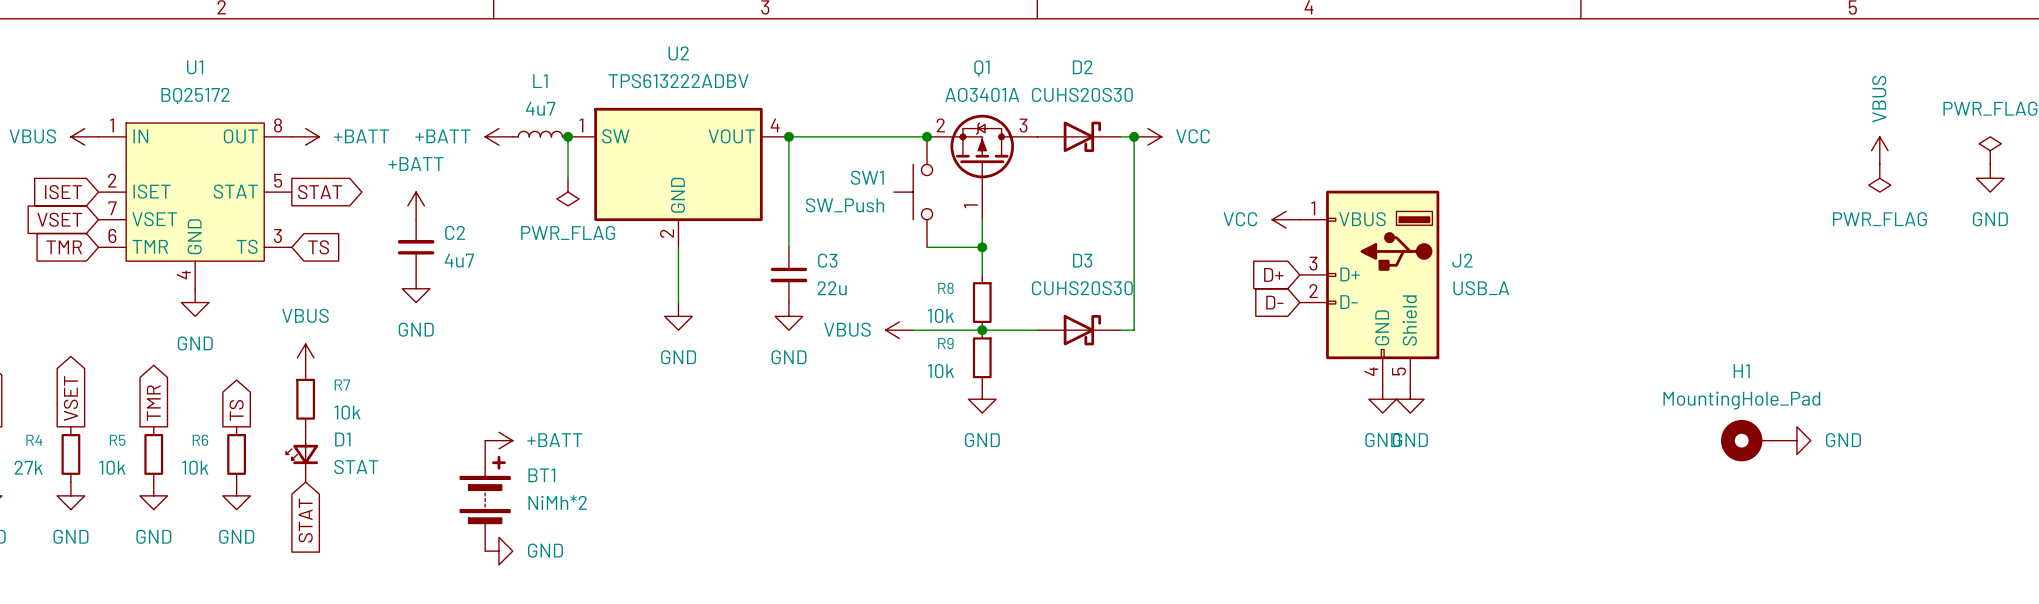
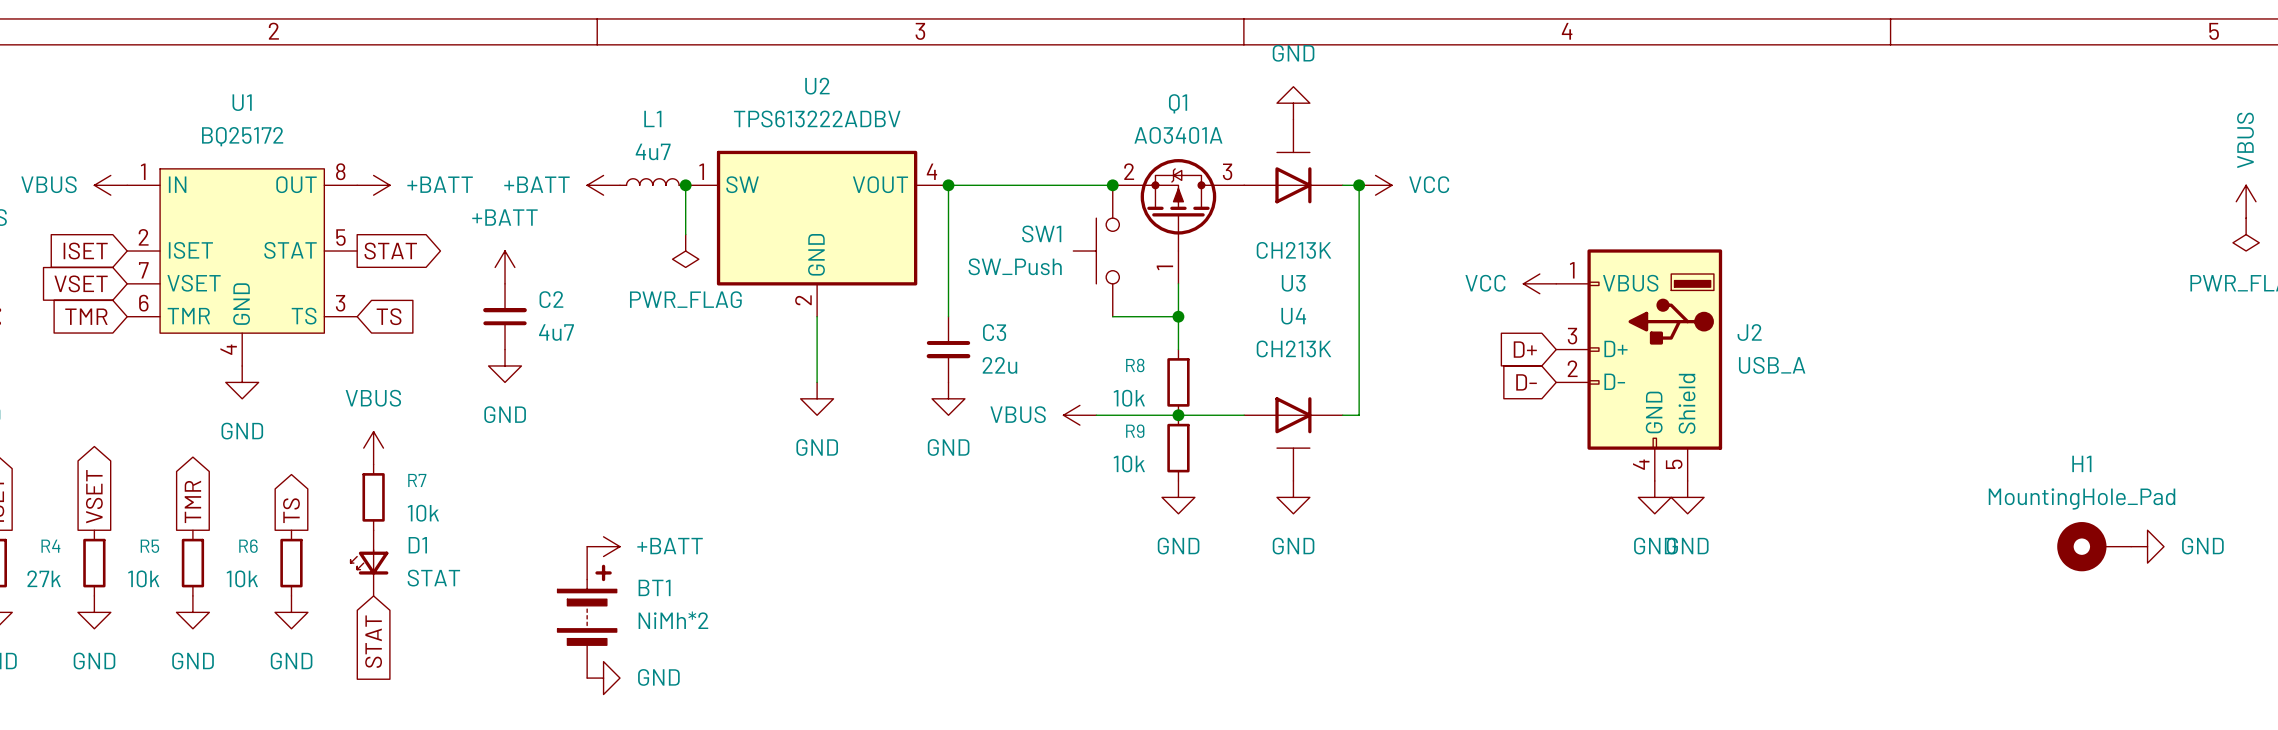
power symbol: none -> GND (1293, 103)
U3: none -> CH213K (1293, 161)
D2: CUHS20S30 (1078, 136) -> none
D3: CUHS20S30 (1078, 330) -> none
U4: none -> CH213K (1293, 439)
power symbol: none -> GND (1293, 497)

